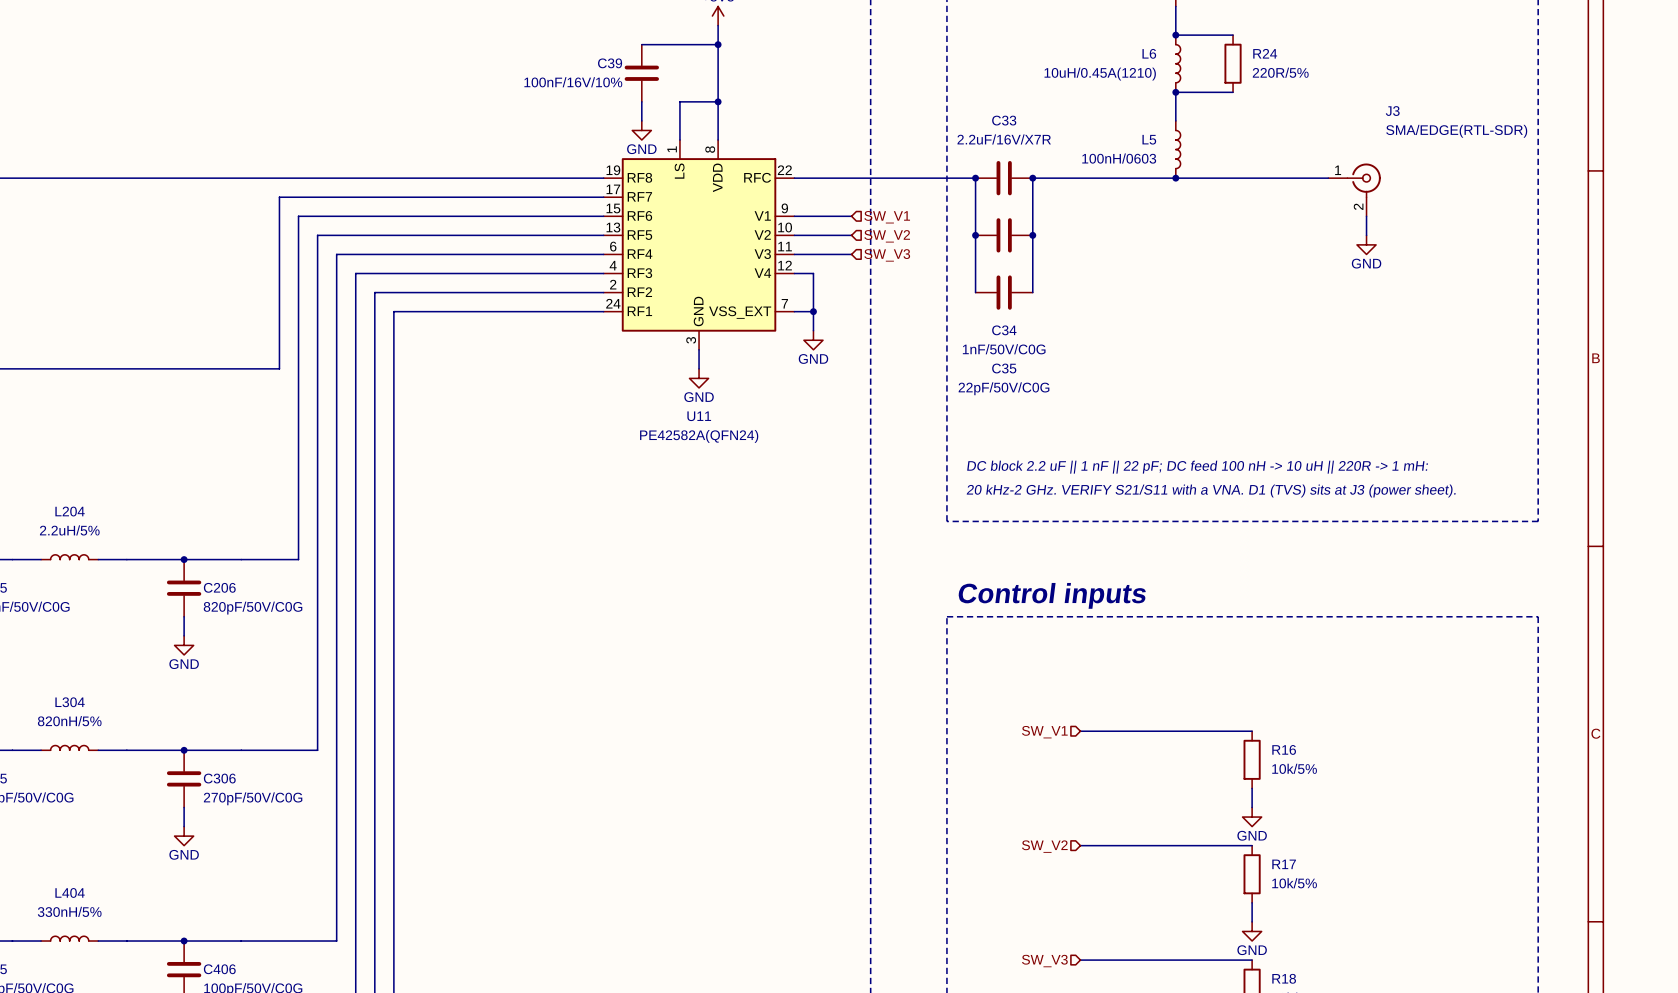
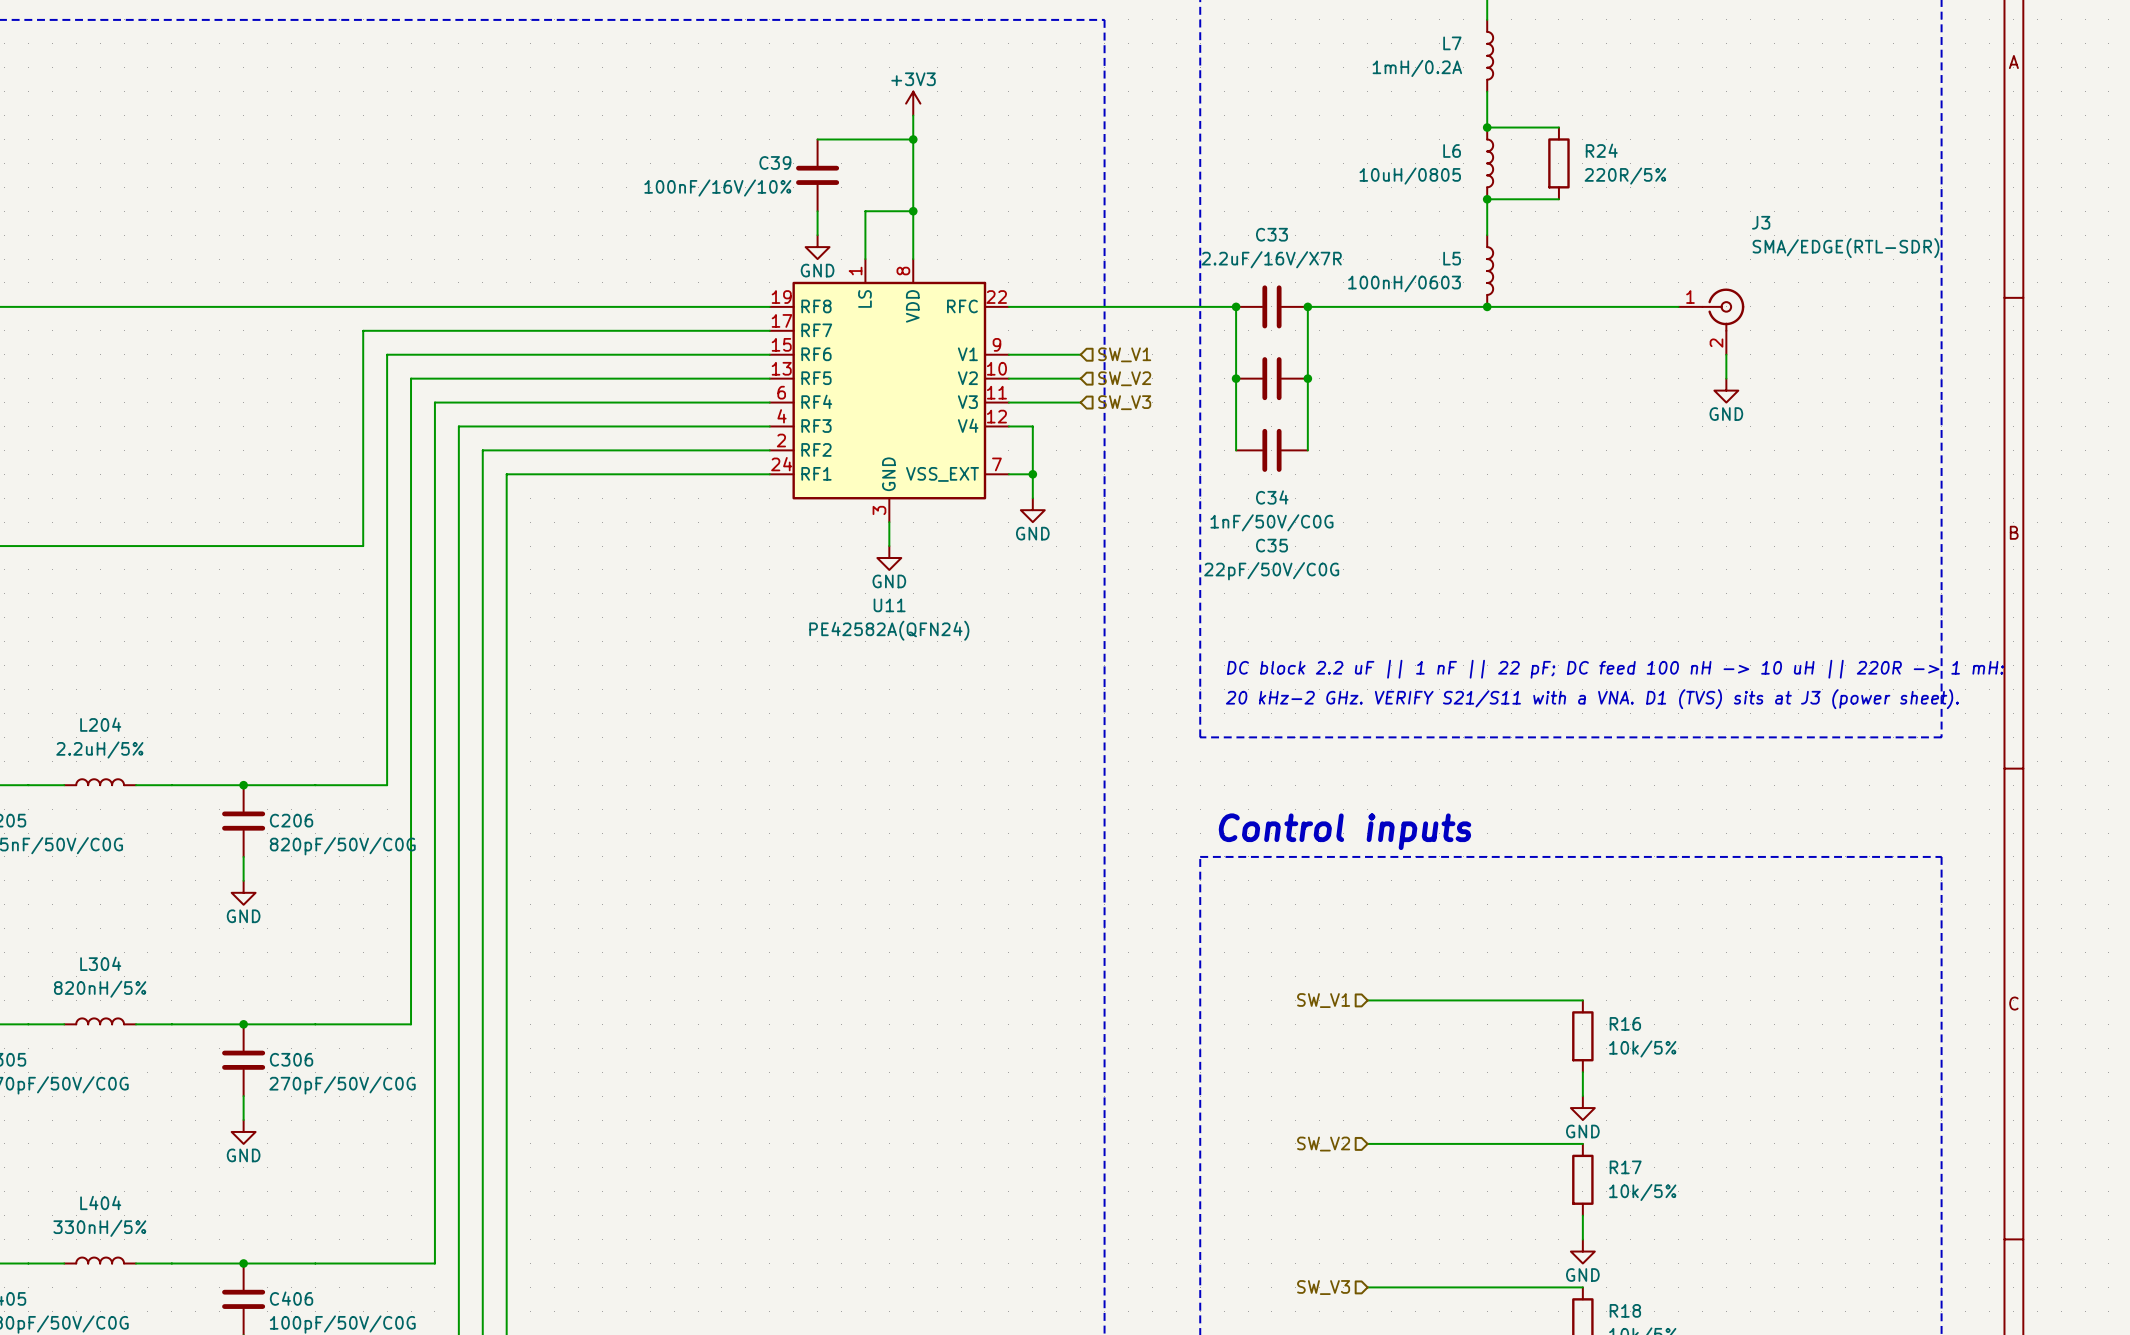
L6 value: 10uH/0.45A(1210) (1100, 74) -> 10uH/0805 (1410, 176)

